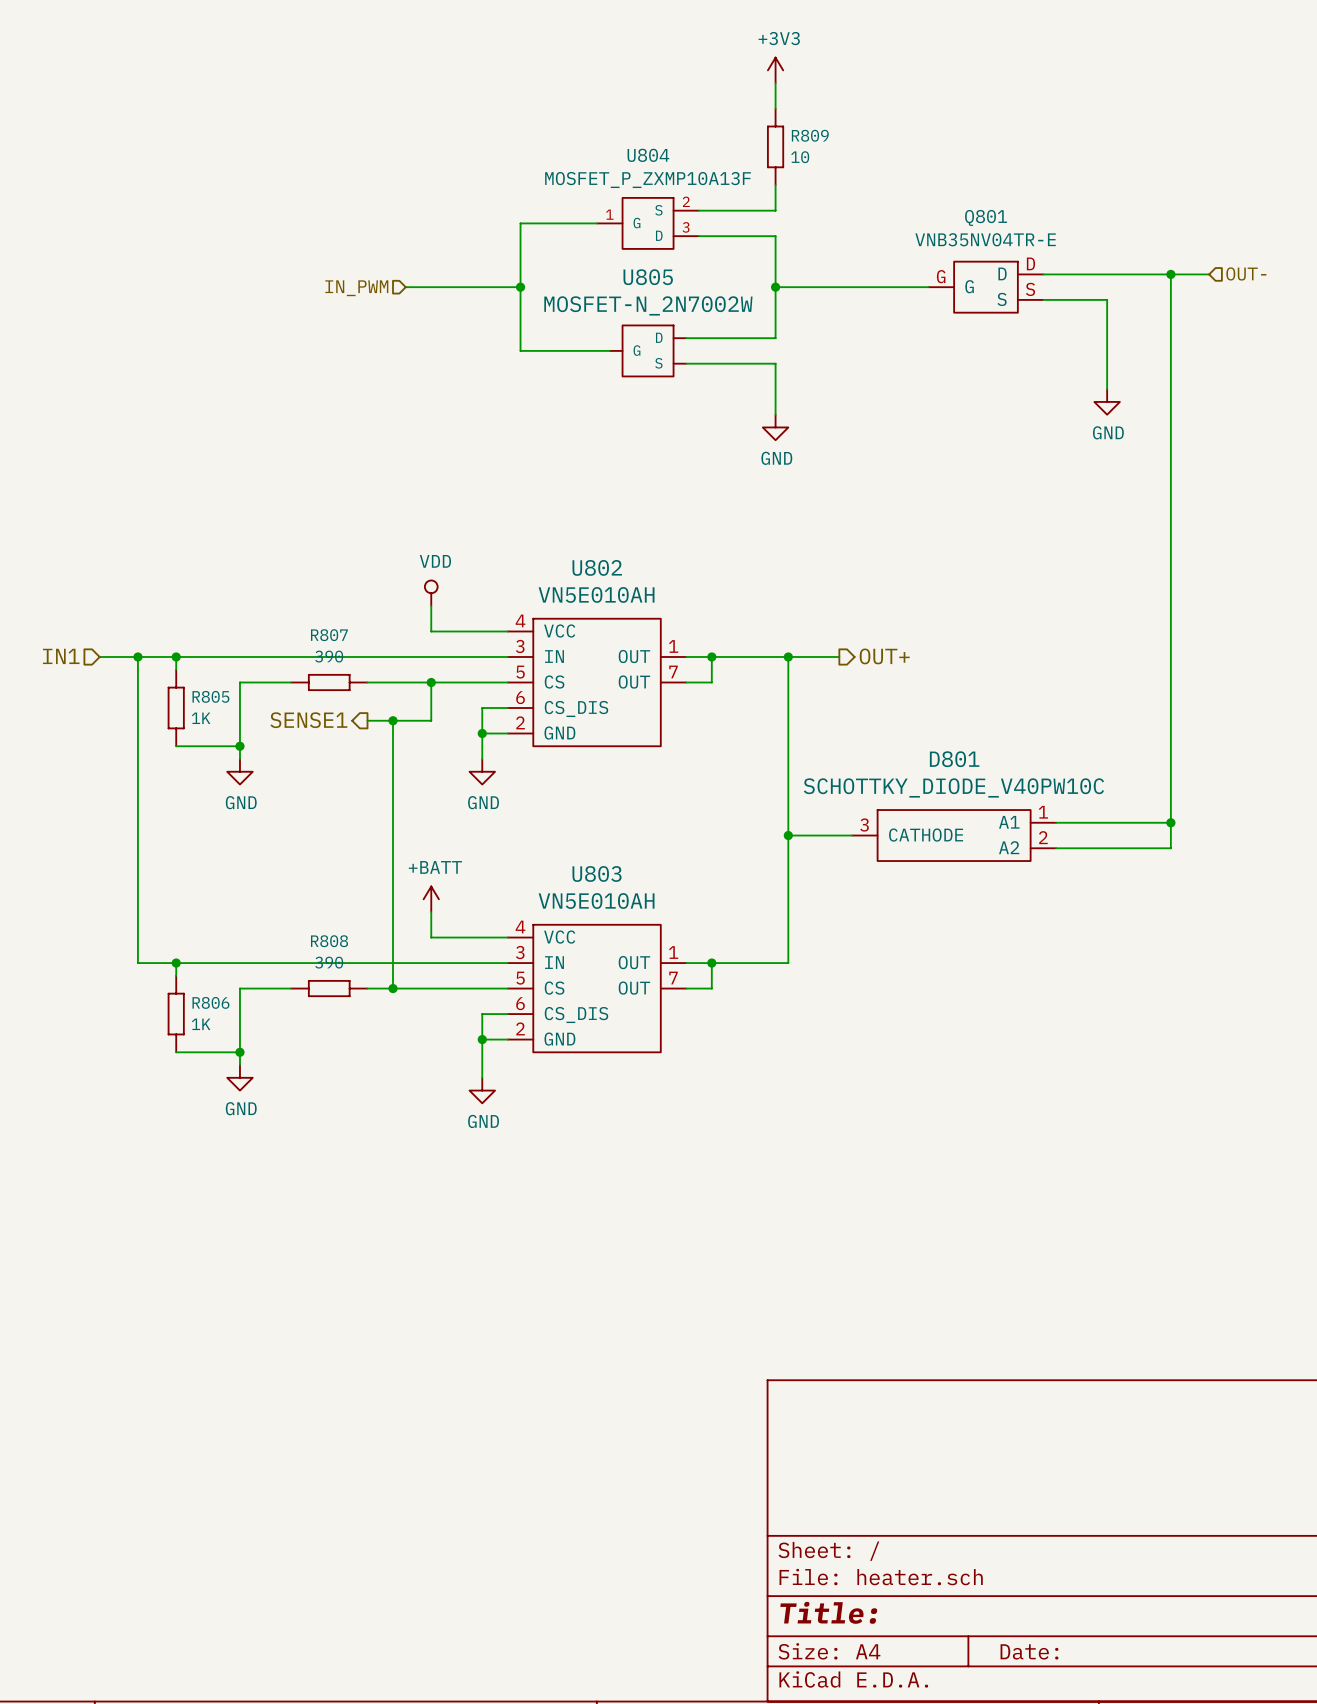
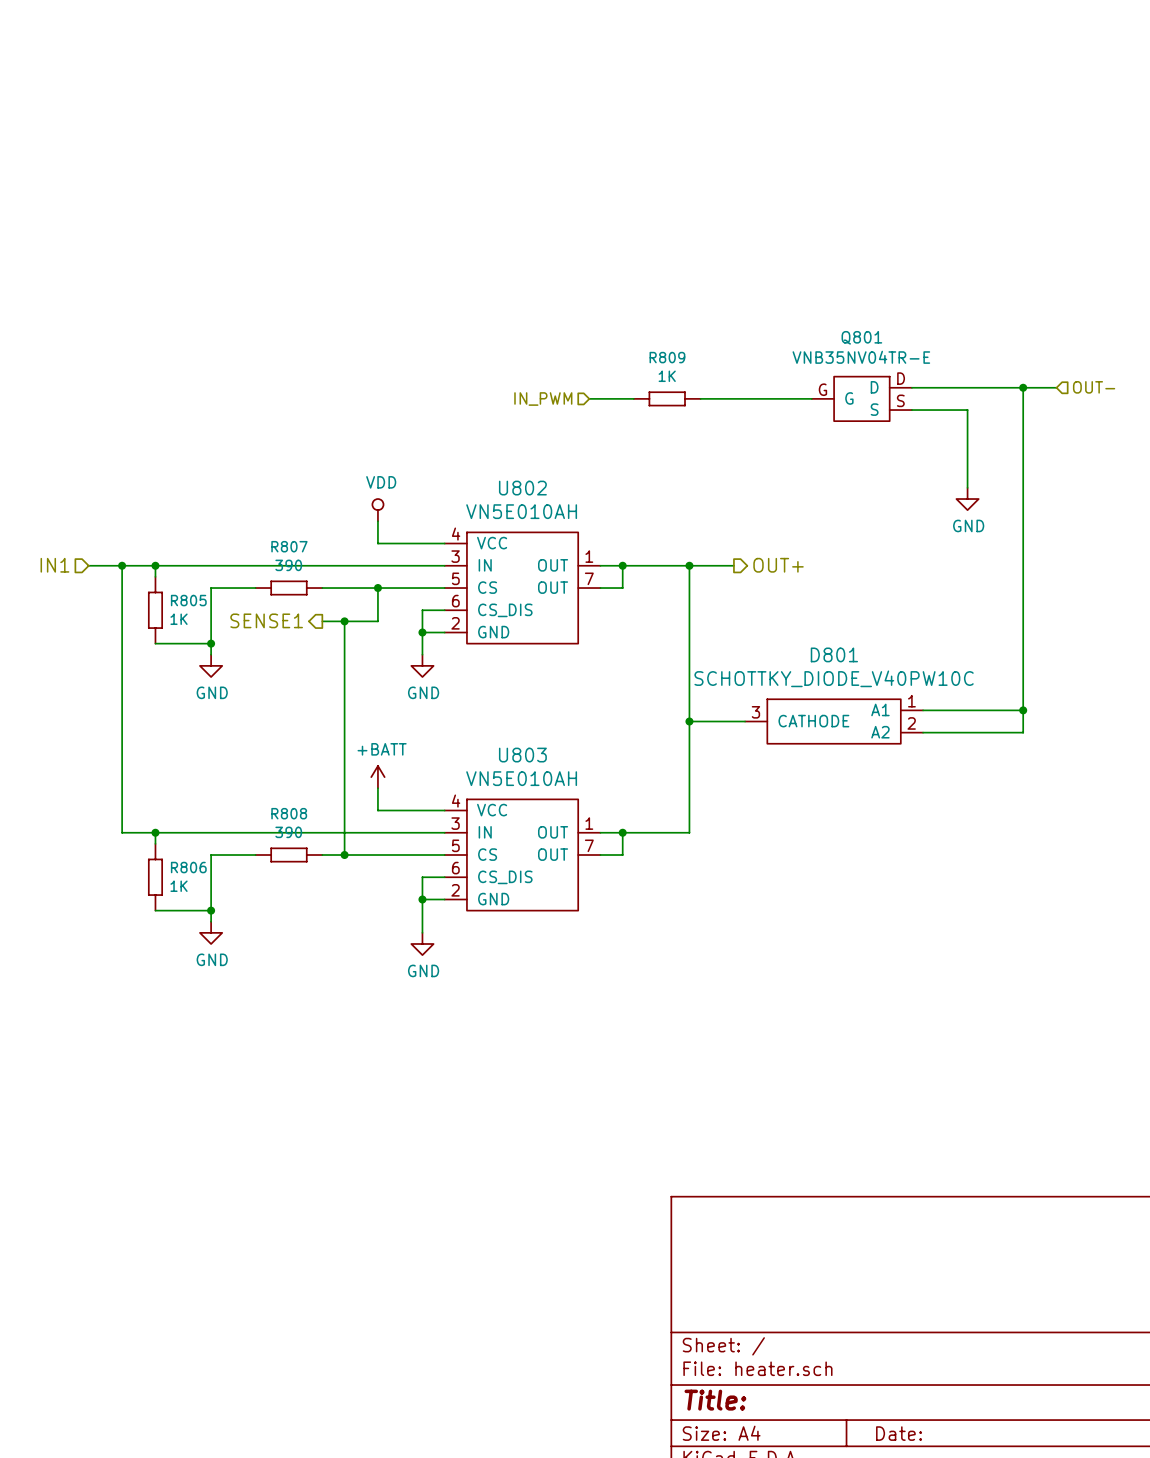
power symbol: +3V3 (775, 70) -> none
wire: (775, 83) (775, 108) -> none
R809 name position: R809 (810, 135) -> R809 (667, 357)
R809 rotation: 0° (775, 146) -> 90° clockwise (667, 398)
R809 position: (775, 146) -> (667, 398)
R809 value: 10 (800, 157) -> 1K (667, 376)
wire: (775, 185) (775, 210) (699, 210) -> none
wire: (597, 223) (520, 223) (520, 350) (609, 350) -> none
U804: MOSFET_P_ZXMP10A13F (648, 223) -> none
wire: (699, 236) (775, 236) (775, 338) (686, 338) -> none
hierarchical label position: OUT- (1246, 273) -> OUT- (1094, 387)
wire: (1043, 274) (1209, 274) -> (911, 387) (1056, 387)
wire: (1170, 274) (1170, 452) -> none
junction: (1170, 274) -> none
wire: (405, 287) (520, 287) -> none
junction: (520, 287) -> none
wire: (775, 287) (928, 287) -> none
junction: (775, 287) -> none
Q801 position: (985, 287) -> (861, 398)
hierarchical label: IN_PWM (356, 288) -> none
wire: (1043, 299) (1107, 299) (1107, 389) -> (911, 410) (967, 410) (967, 487)
U805: MOSFET-N_2N7002W (648, 350) -> none
wire: (686, 363) (775, 363) (775, 414) -> none
power symbol position: GND (1107, 401) -> GND (967, 499)
power symbol: GND (775, 427) -> none
junction: none -> (1023, 387)
wire: none -> (589, 398) (633, 398)
wire: none -> (700, 398) (811, 398)
hierarchical label: none -> IN_PWM (543, 399)

